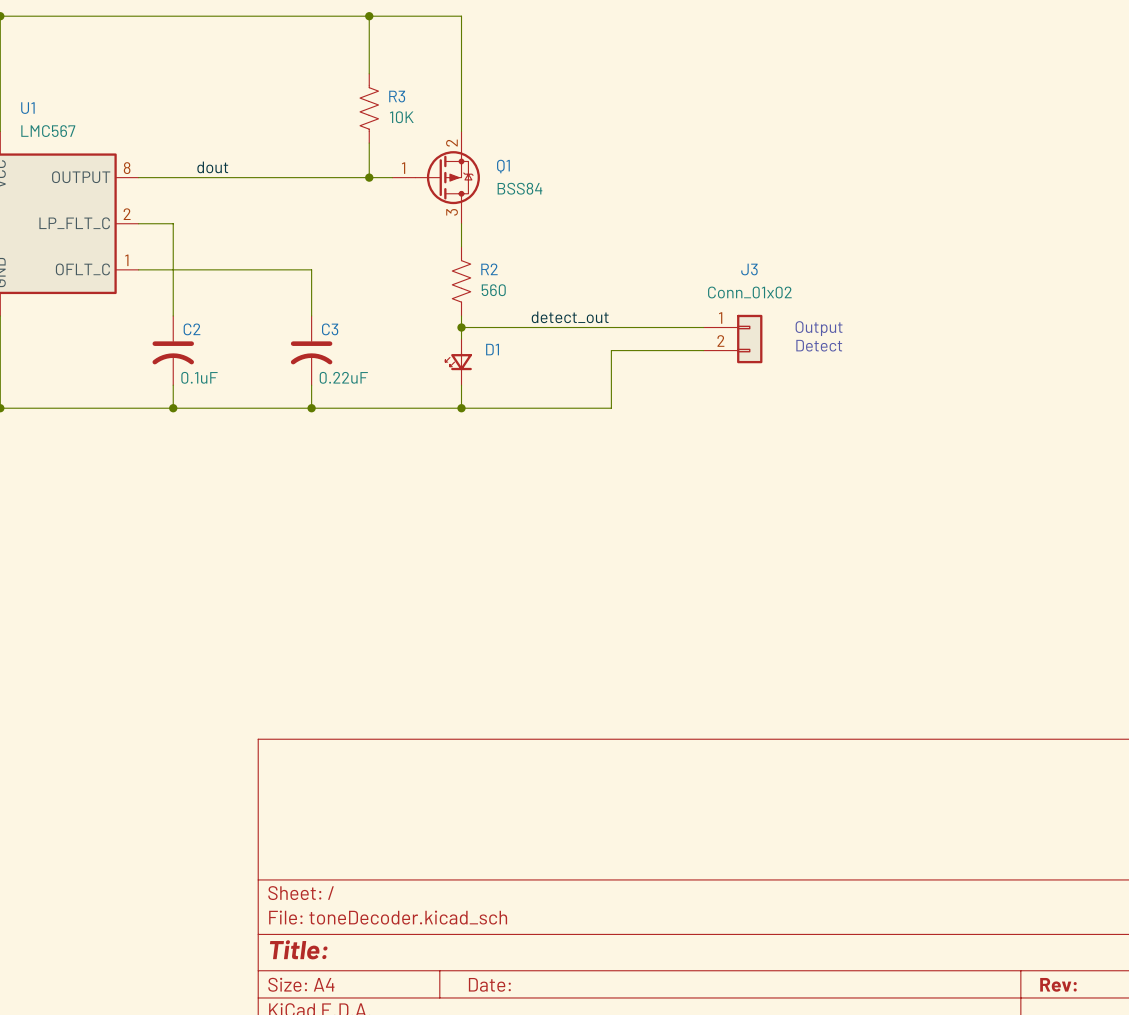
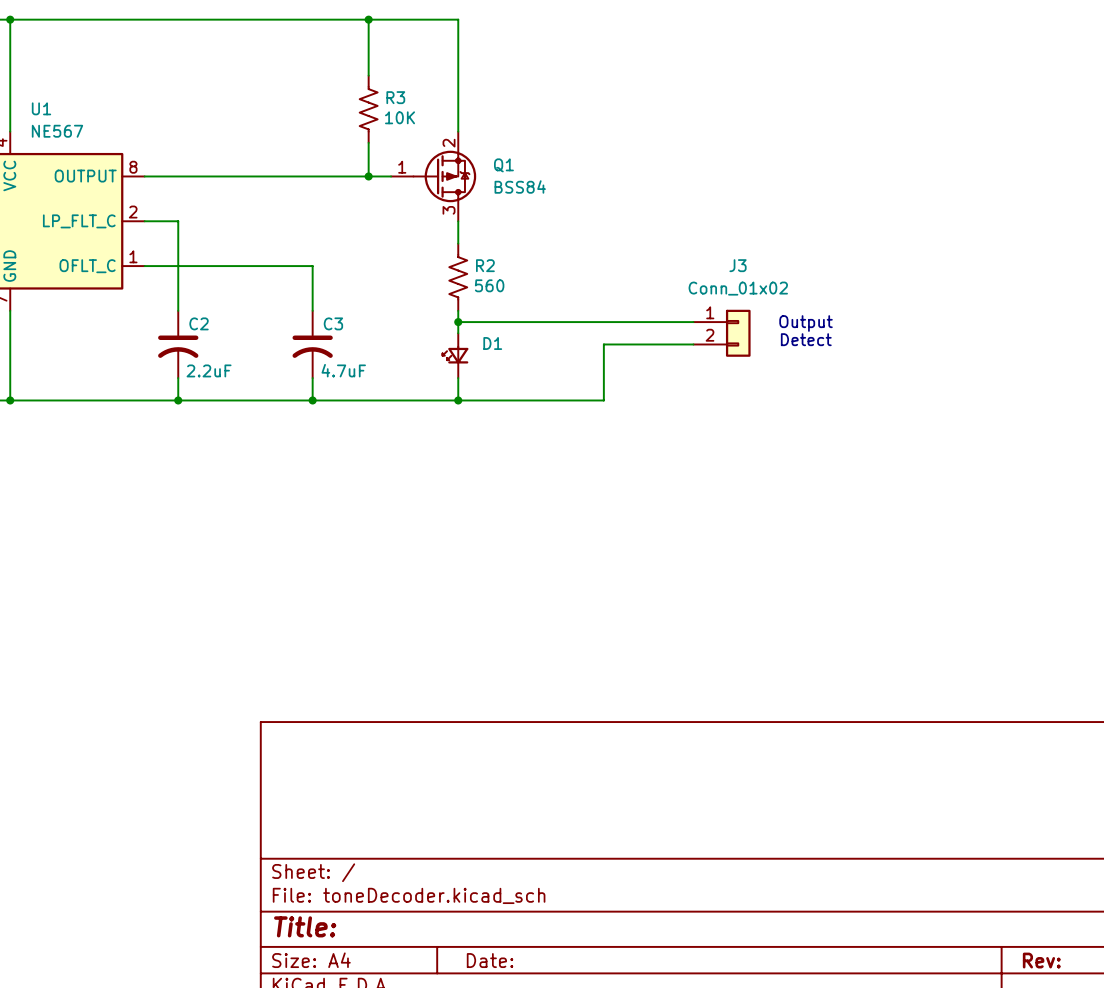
U1 value: LMC567 (48, 131) -> NE567 (57, 131)
label: dout (212, 167) -> none
label: detect_out (570, 317) -> none
C2 value: 0.1uF (199, 377) -> 2.2uF (209, 370)
C3 value: 0.22uF (343, 377) -> 4.7uF (343, 370)

